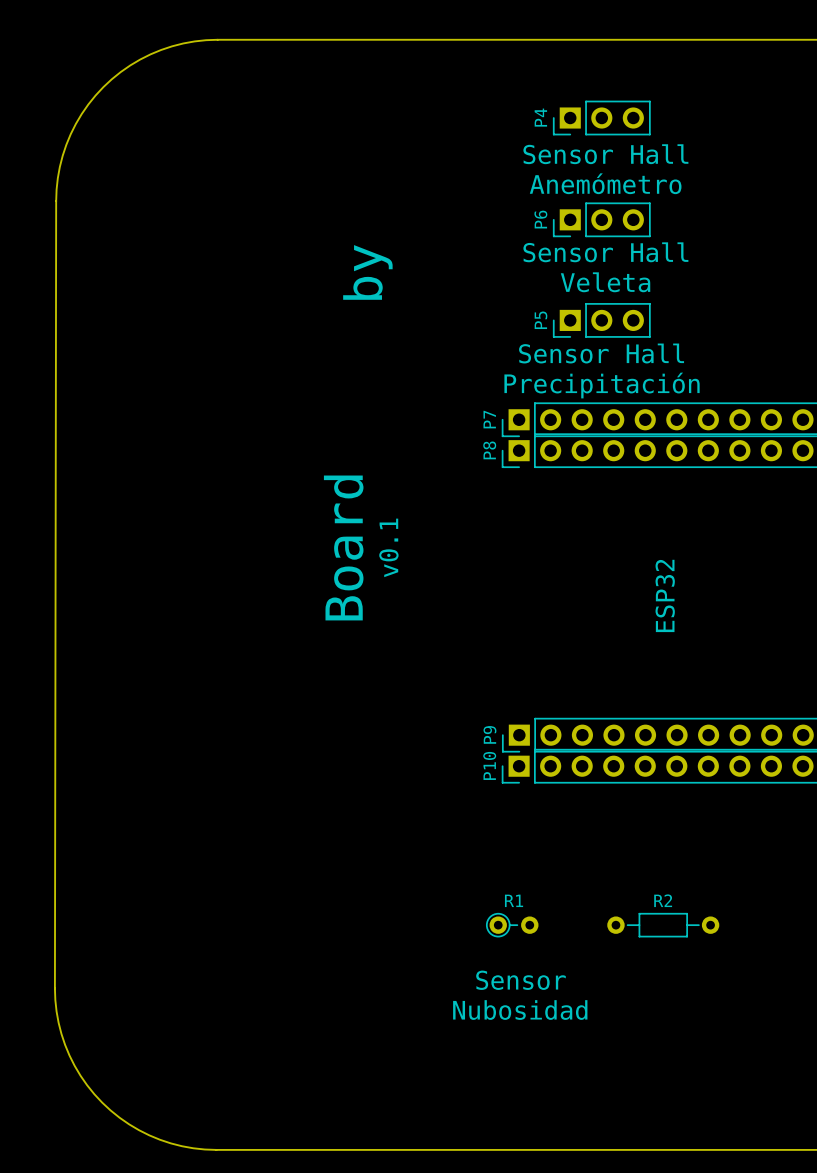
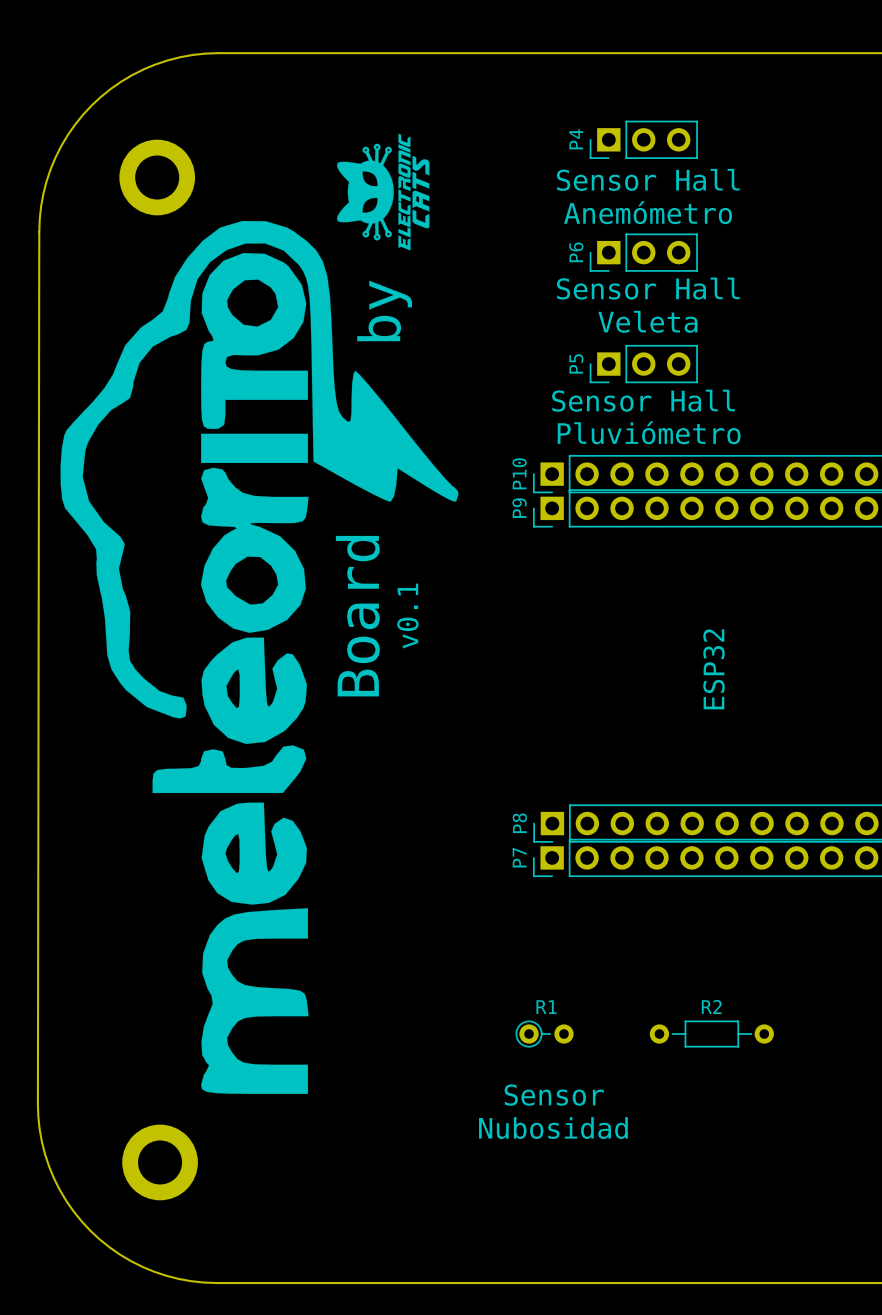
drawing: none -> [60, 133, 459, 1094]
part: none -> (157, 177)
text: Precipitación (602, 385) -> Pluviómetro (649, 432)
P7 name: P7 (489, 419) -> P10 (519, 473)
P8 name: P8 (489, 450) -> P9 (519, 508)
P9 name: P9 (489, 734) -> P8 (519, 823)
P10 name: P10 (489, 765) -> P7 (519, 857)
part: none -> (160, 1162)

